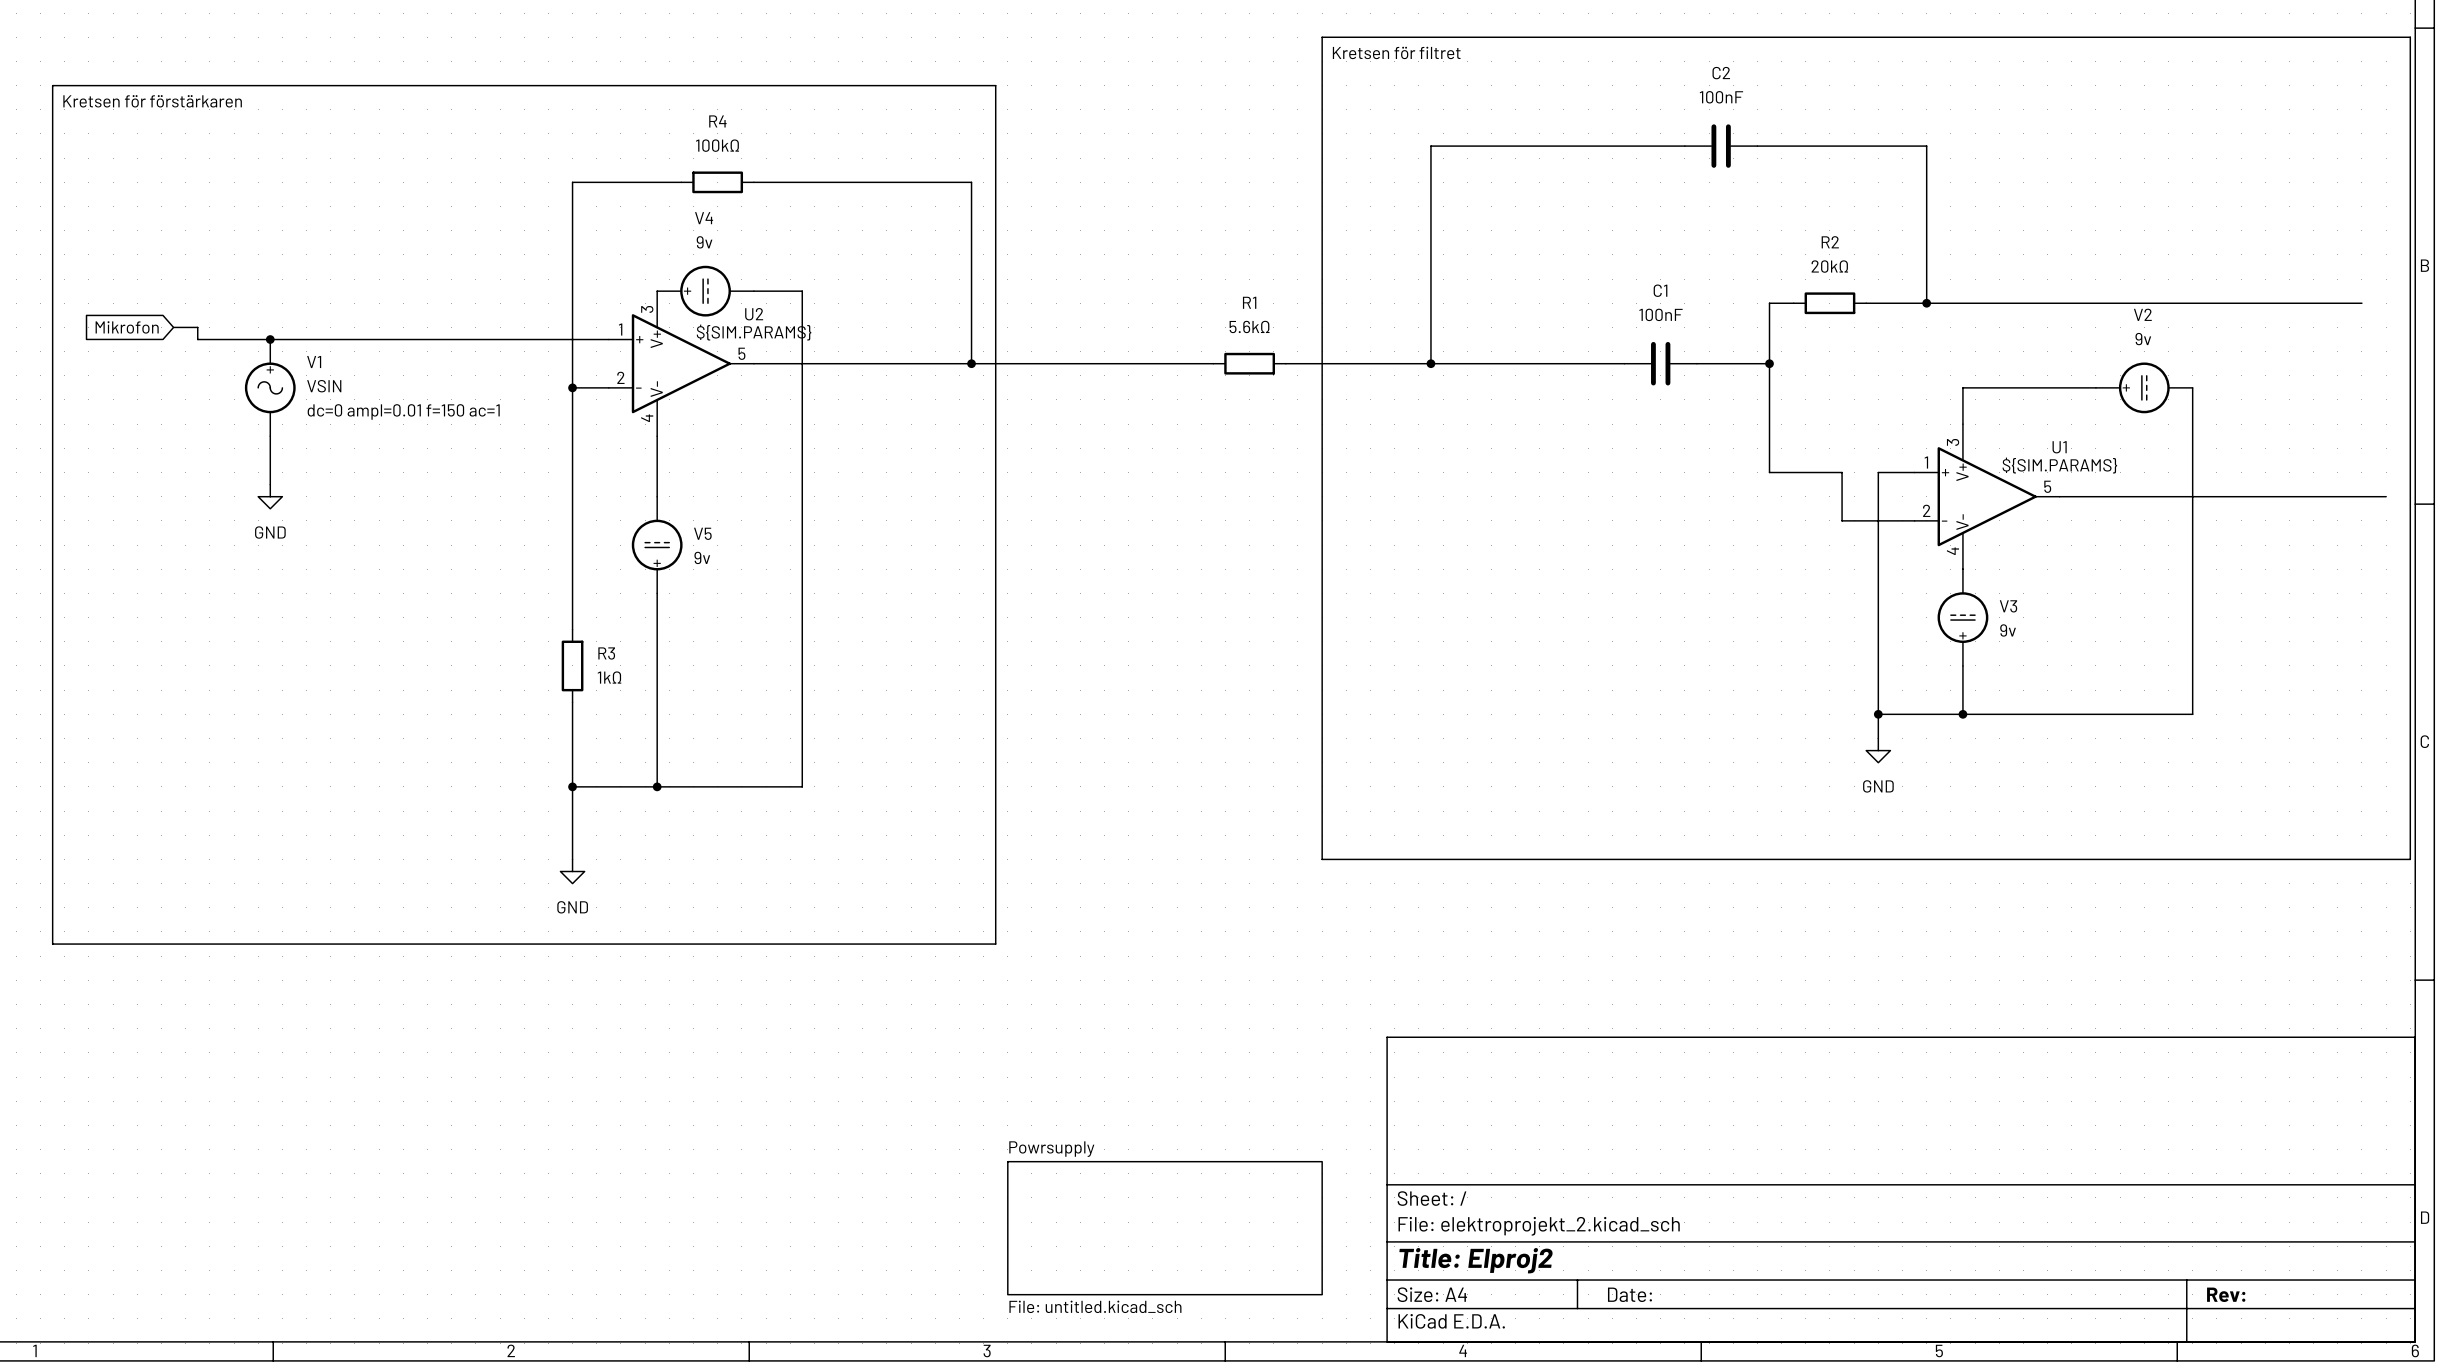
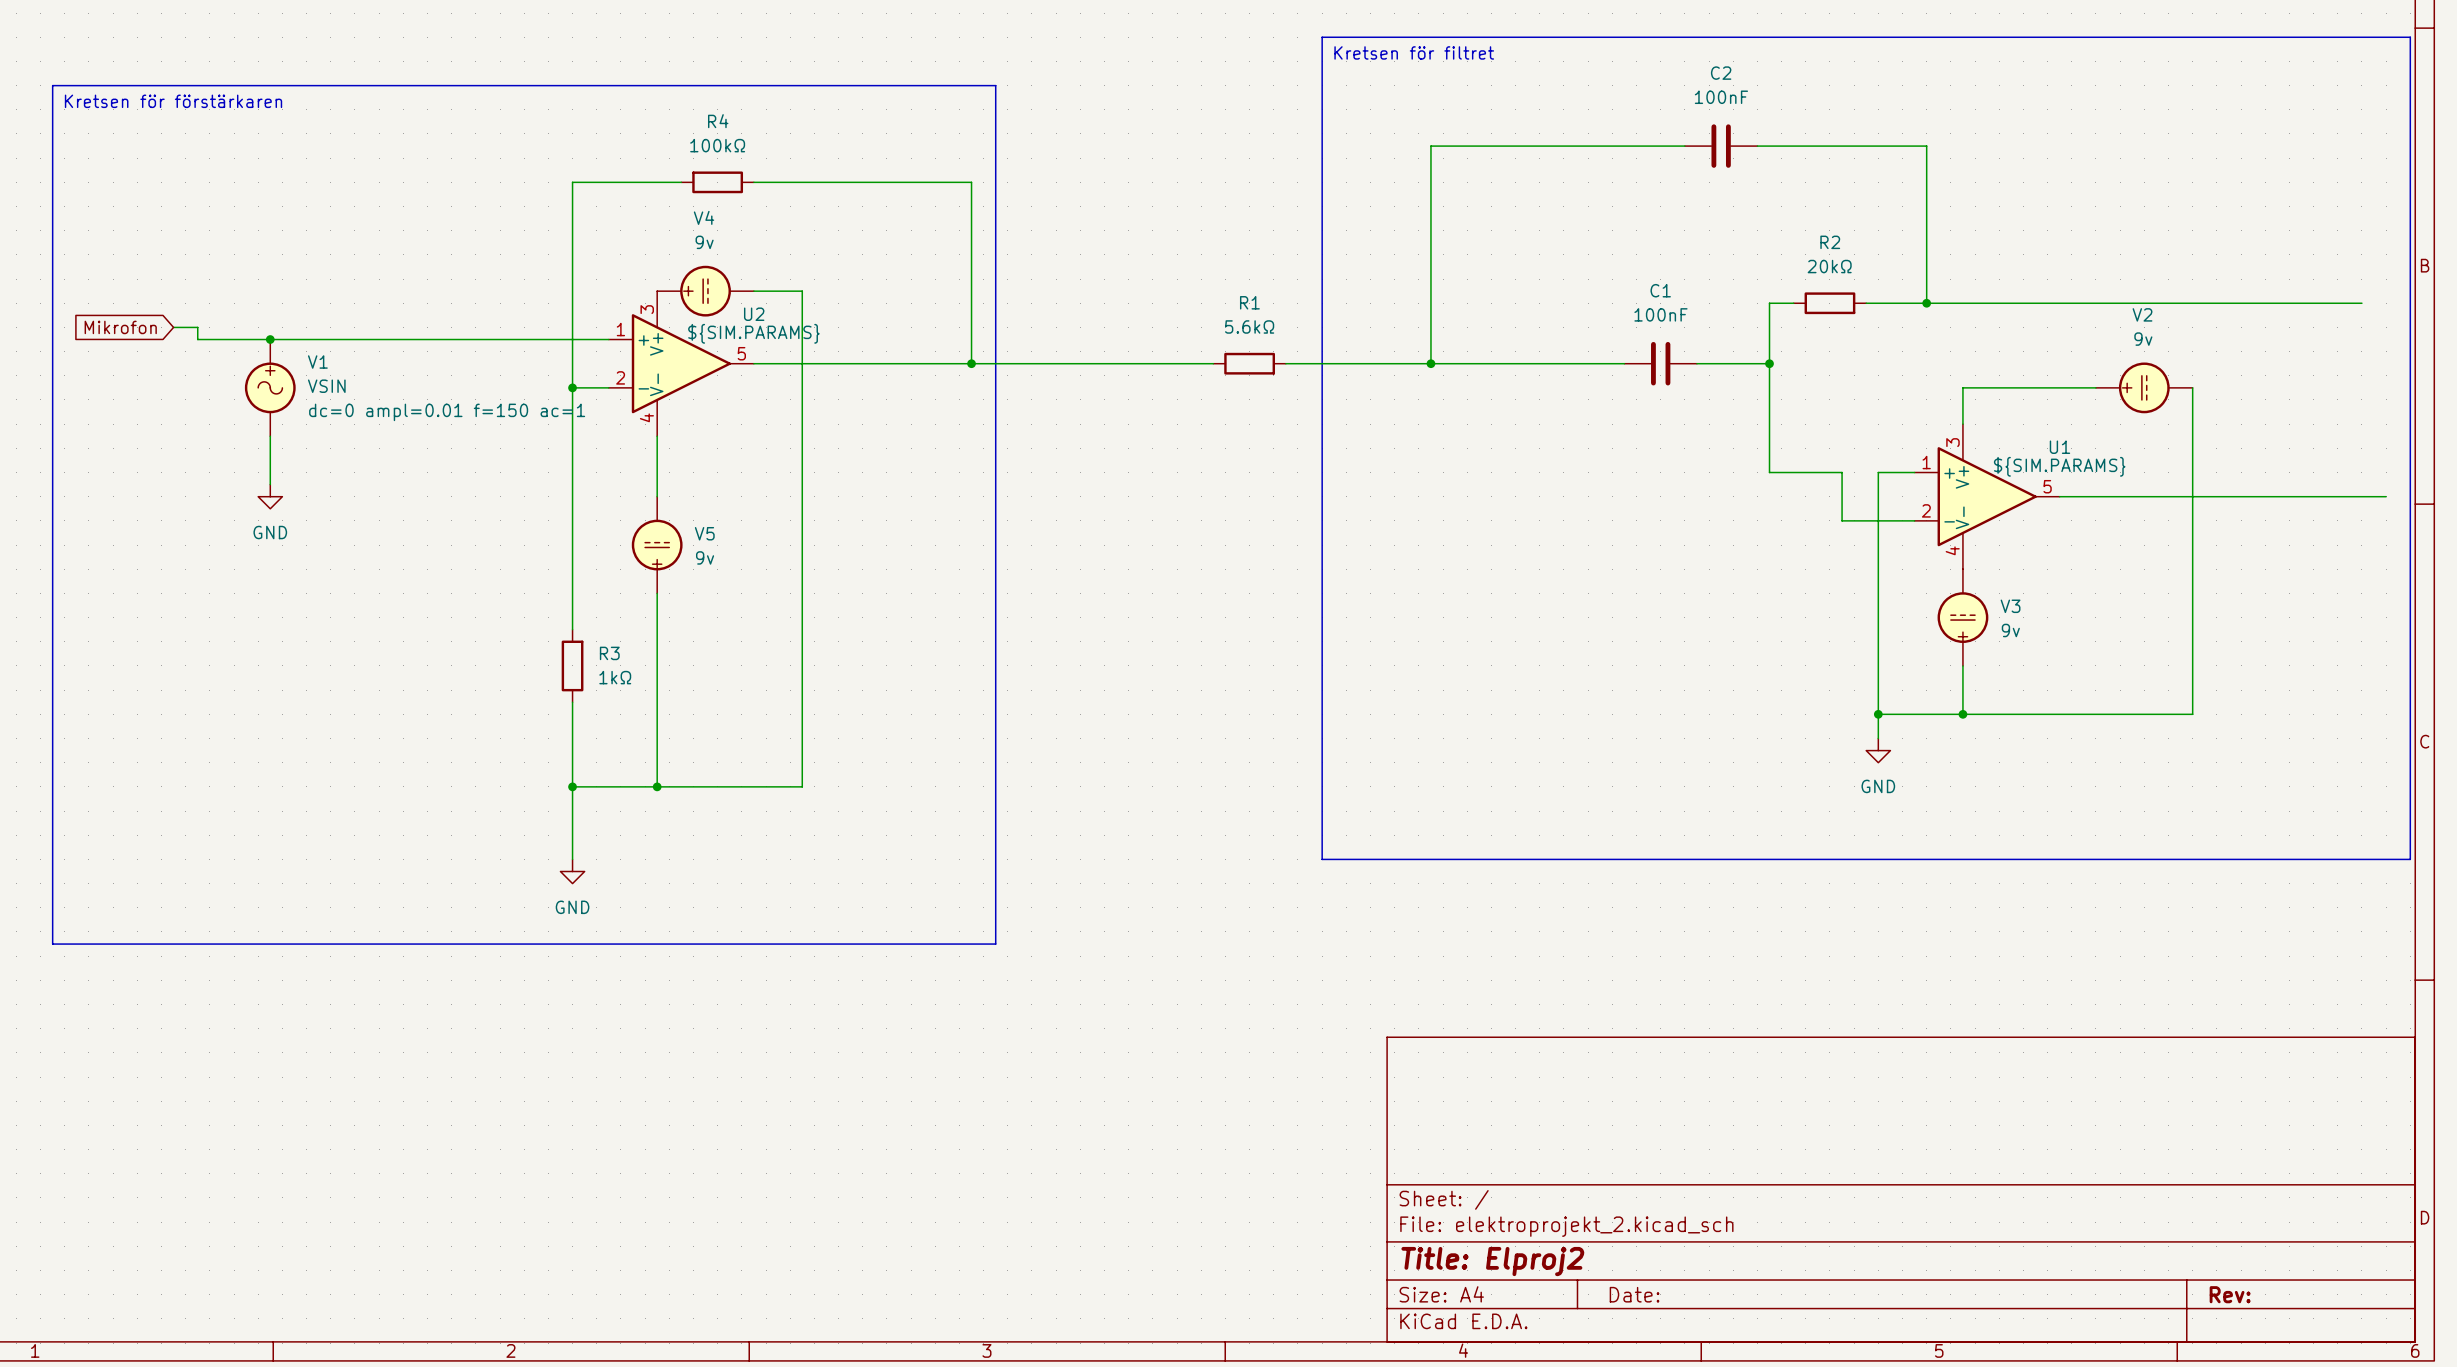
sheet Powrsupply: File: untitled.kicad_sch (1164, 1228) -> none

